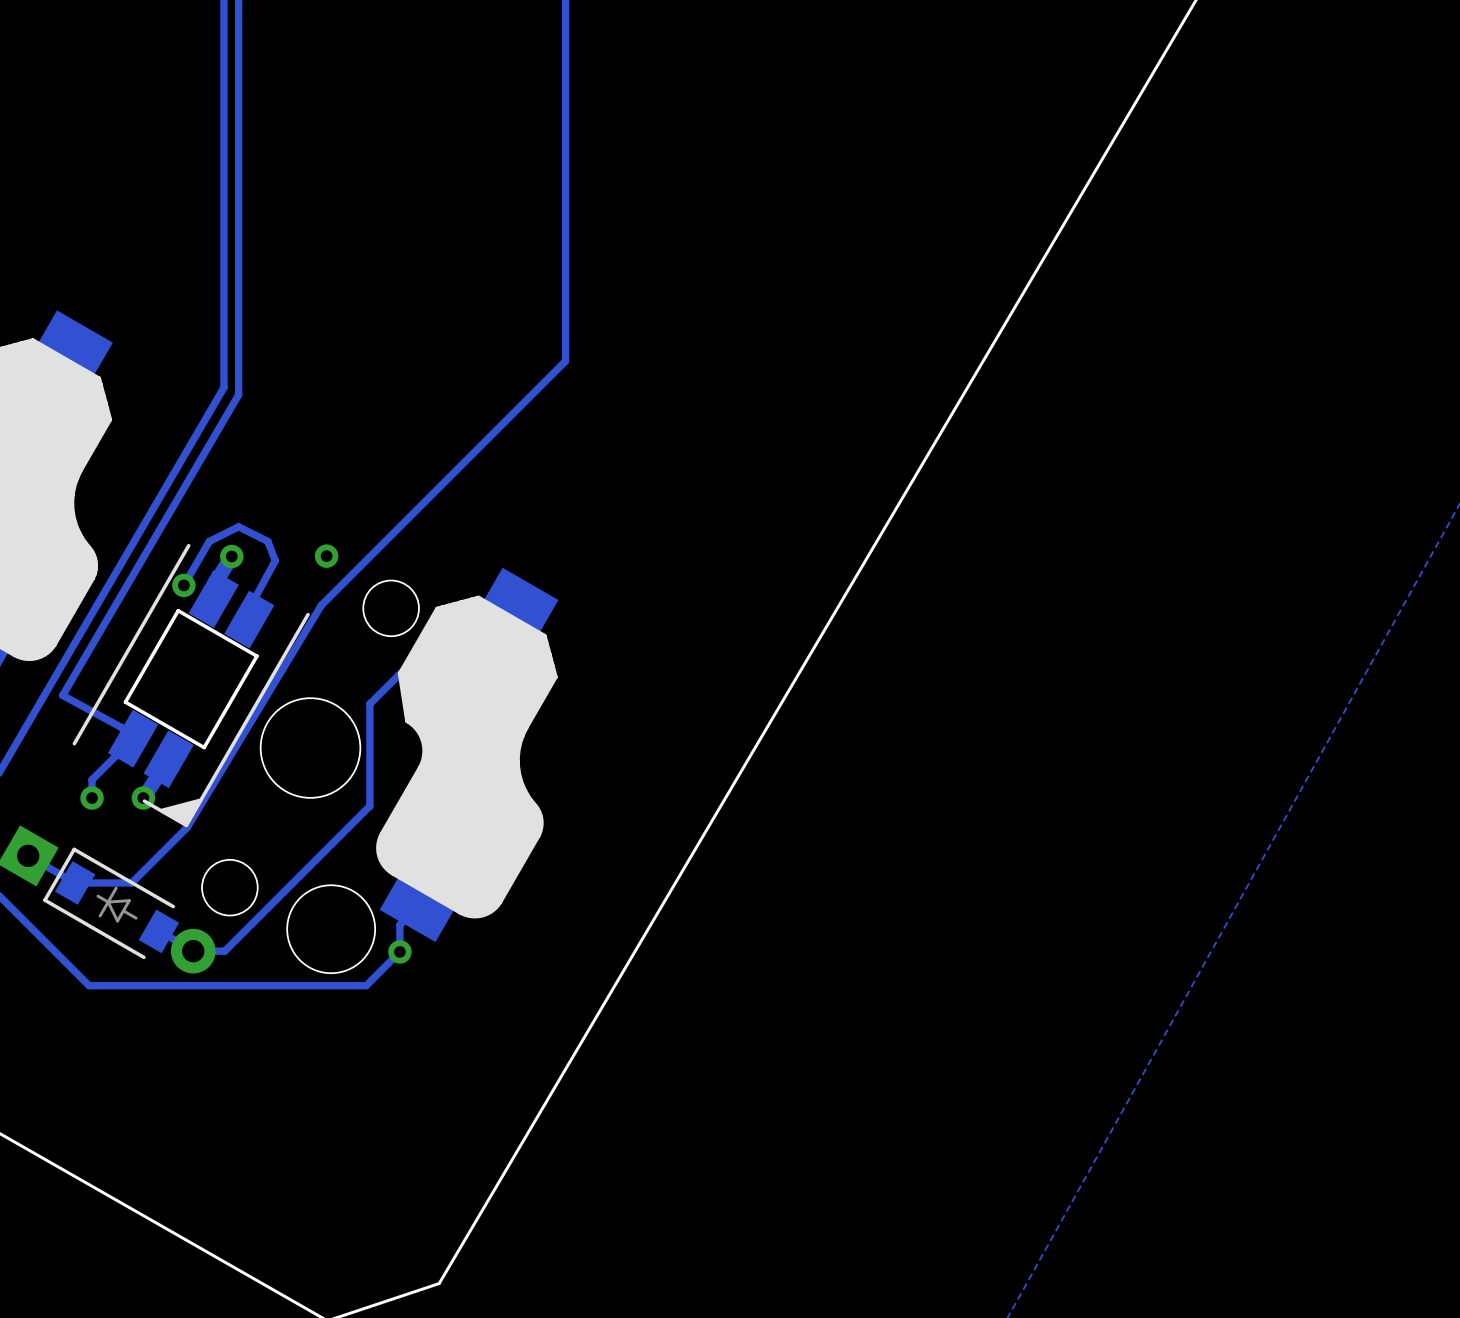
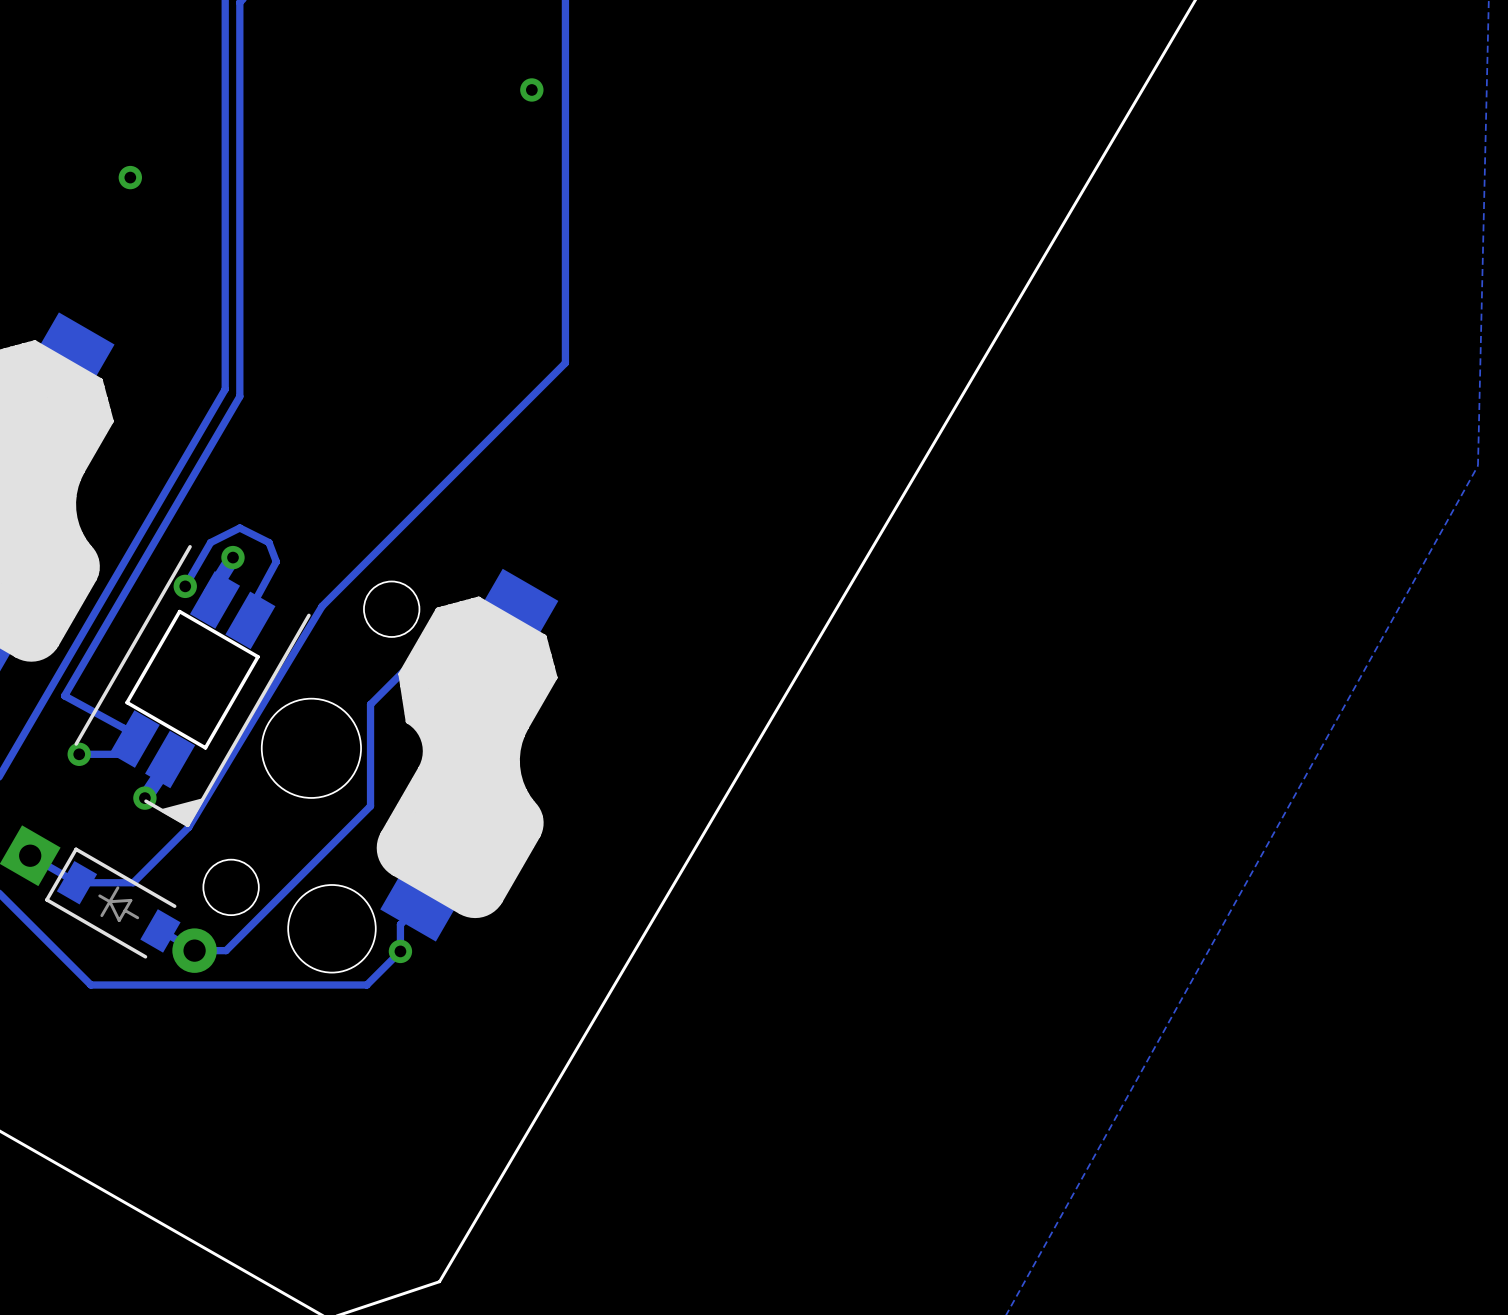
via: none -> (531, 89)
via: none -> (130, 177)
via: (326, 556) -> none
track: (117, 754) (92, 779) (92, 798) -> (119, 754) (79, 754)
via position: (92, 798) -> (79, 754)

